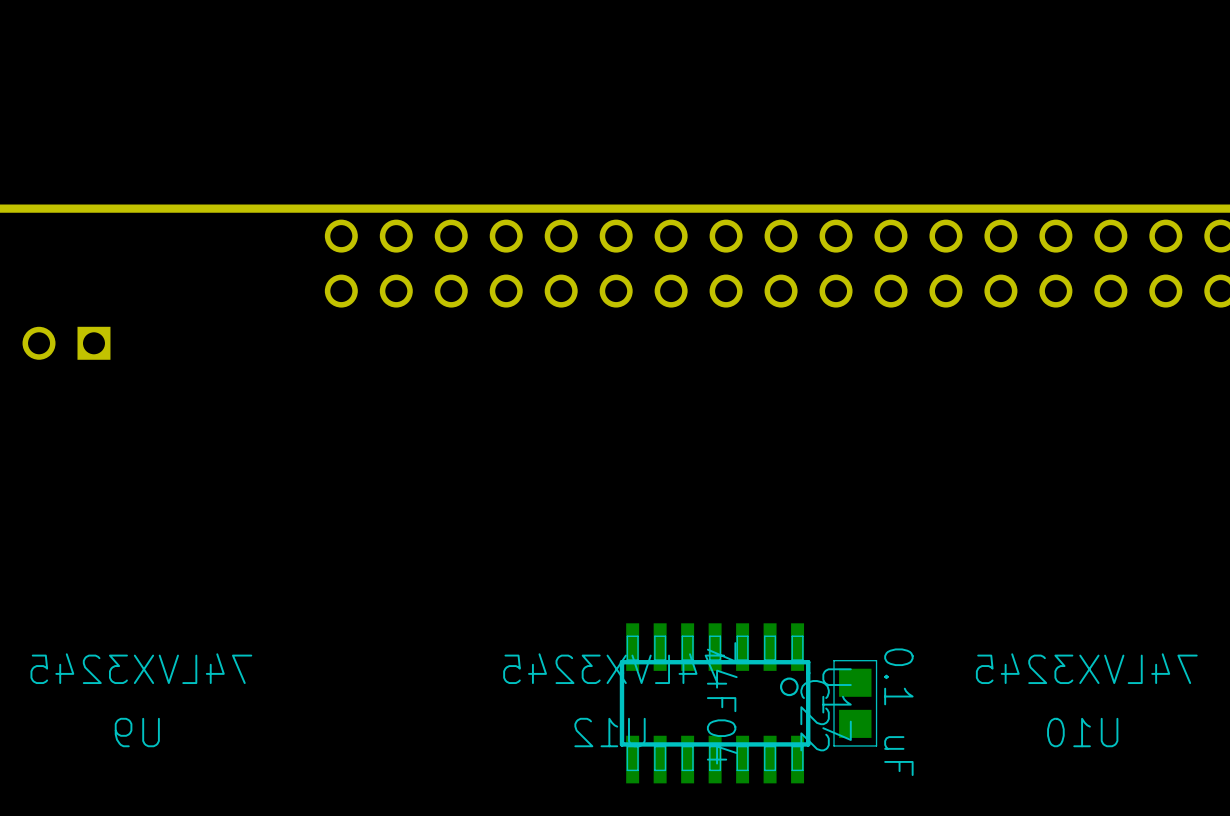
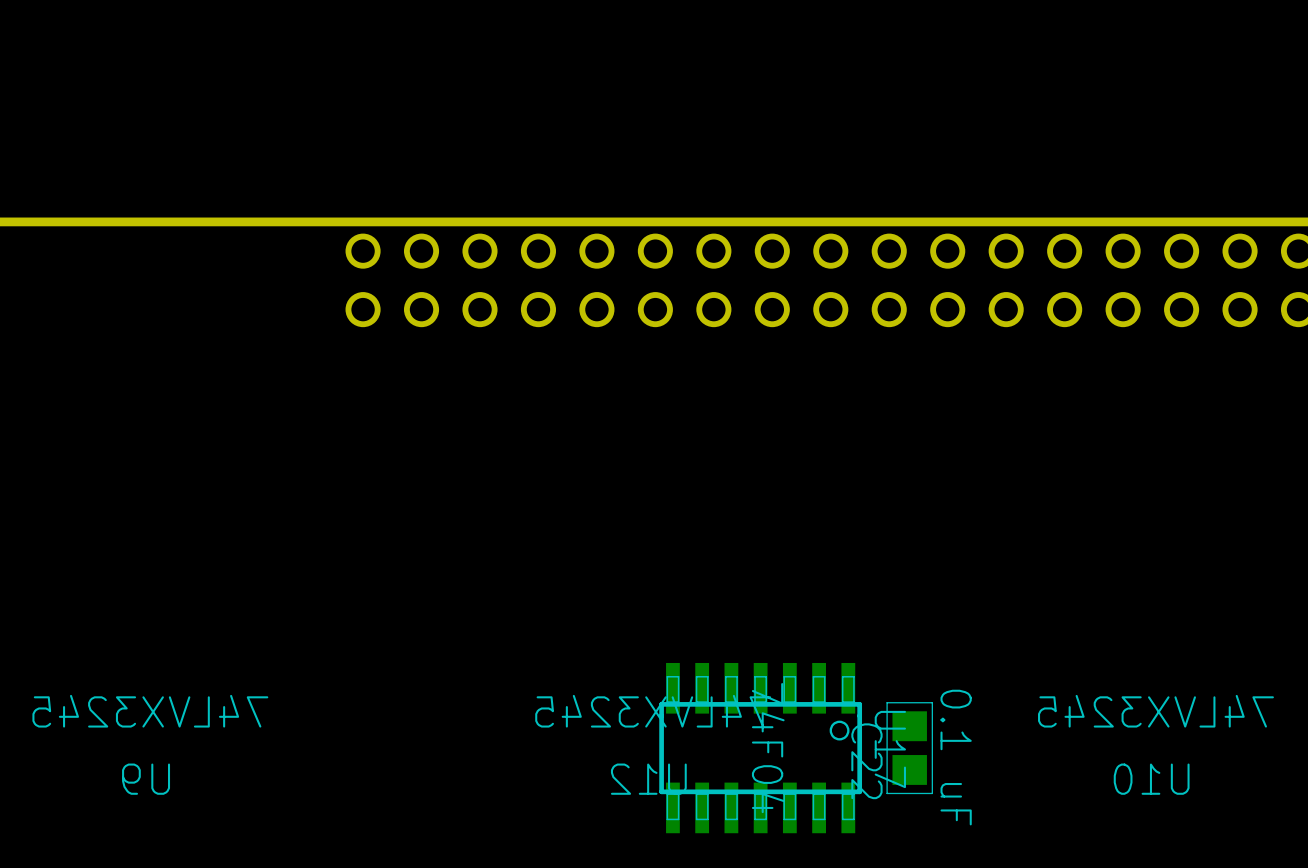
part: (66, 343) -> none

